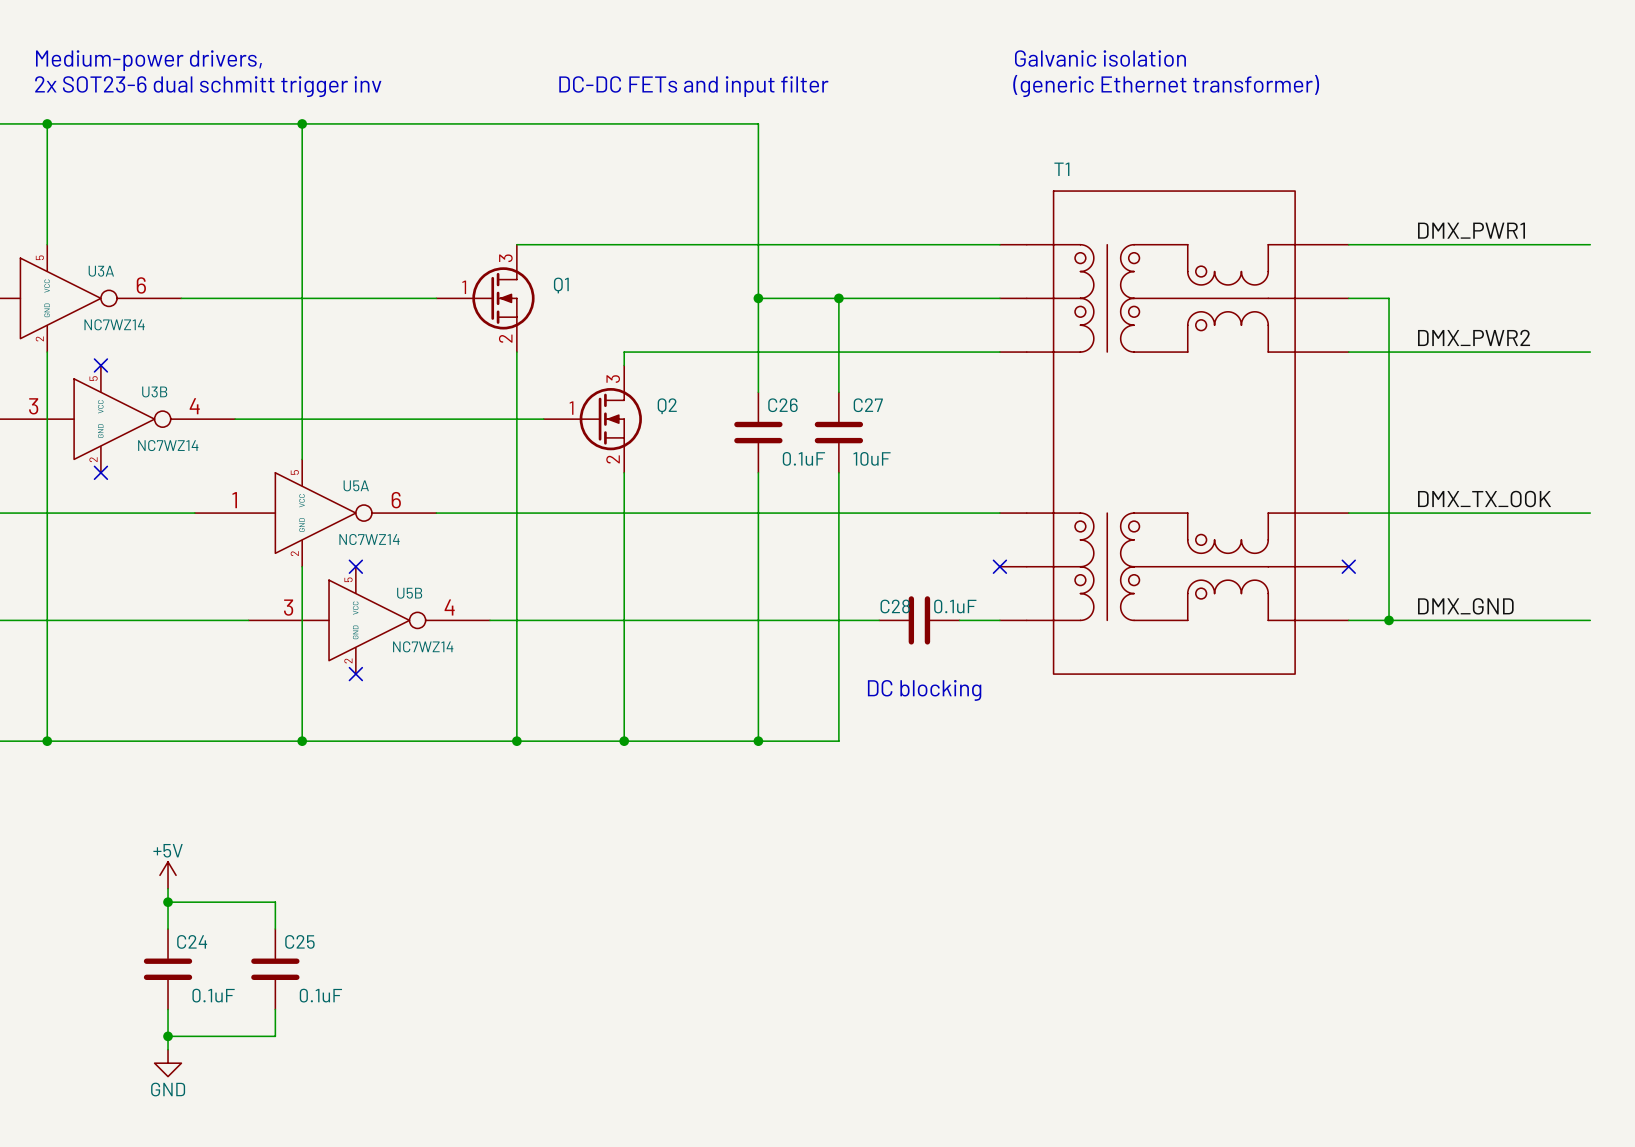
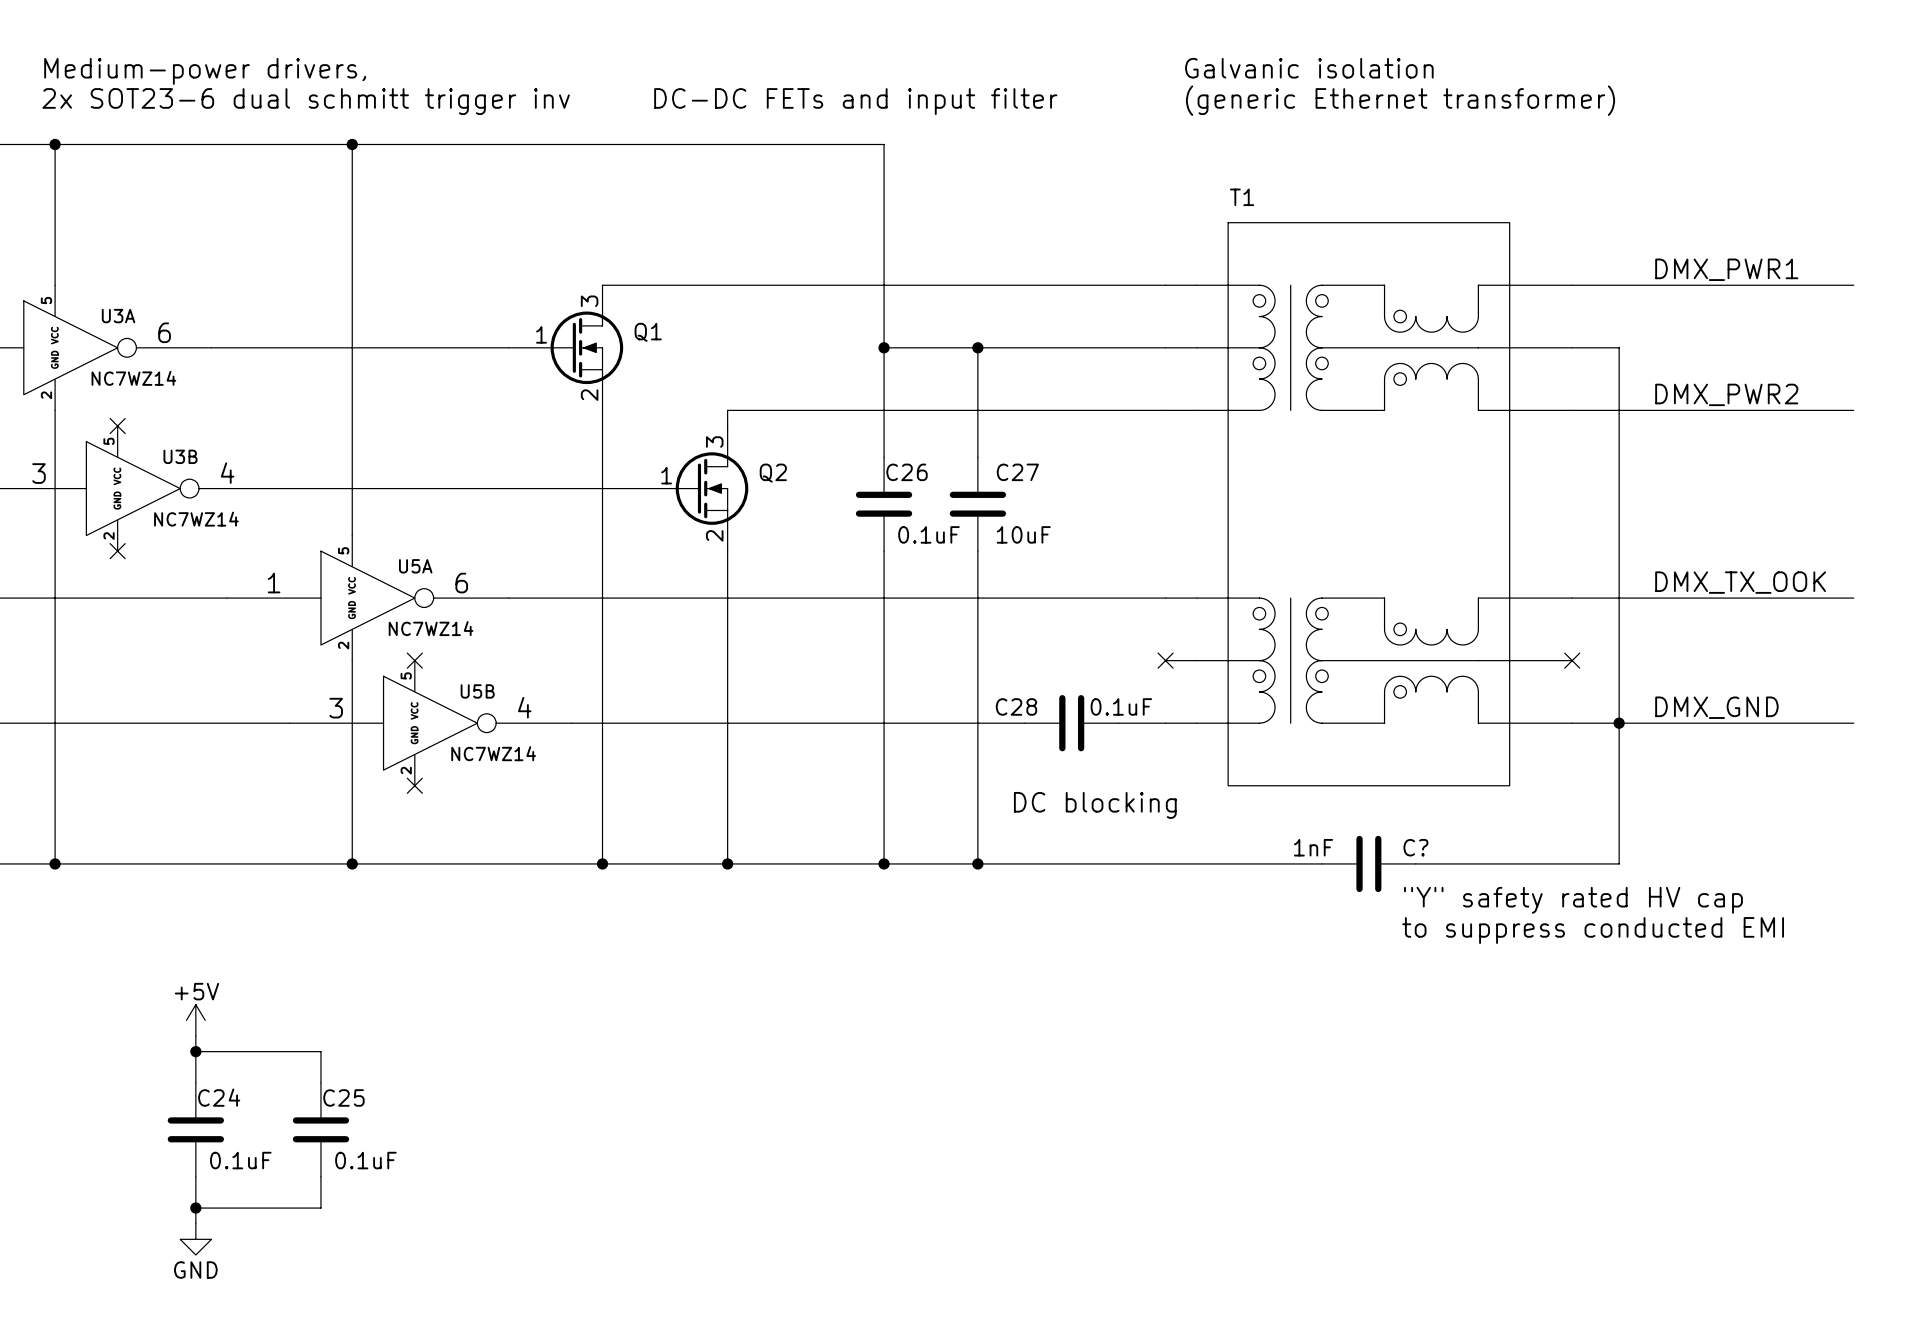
C28 name position: C28 (895, 606) -> C28 (1016, 706)
wire: none -> (1619, 723) (1619, 863) (1415, 863)
wire: none -> (977, 863) (1321, 863)
junction: none -> (977, 863)
C?: none -> 1nF (1368, 863)
text: none -> "Y" safety rated HV cap (1573, 900)
text: none -> to suppress conducted EMI (1593, 930)

